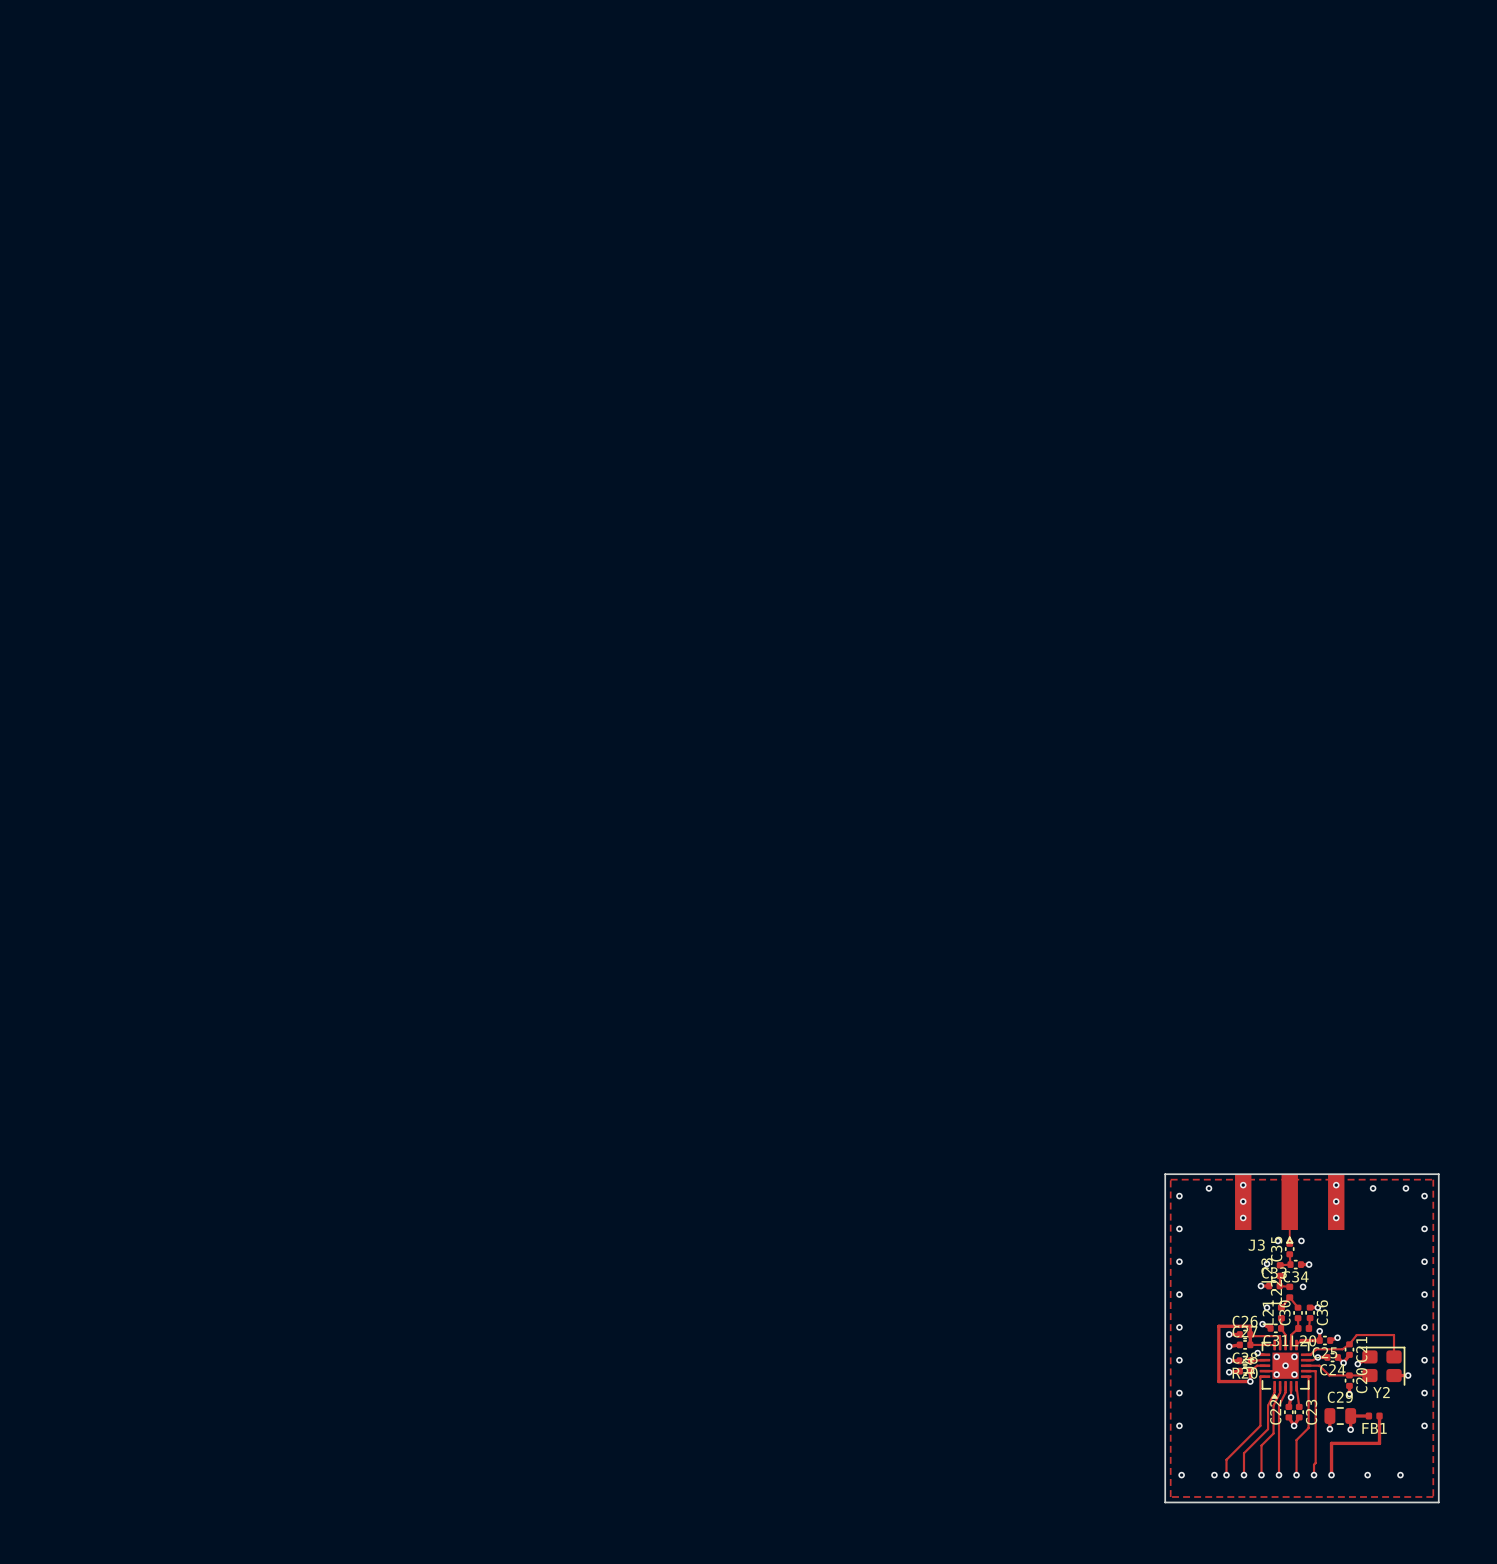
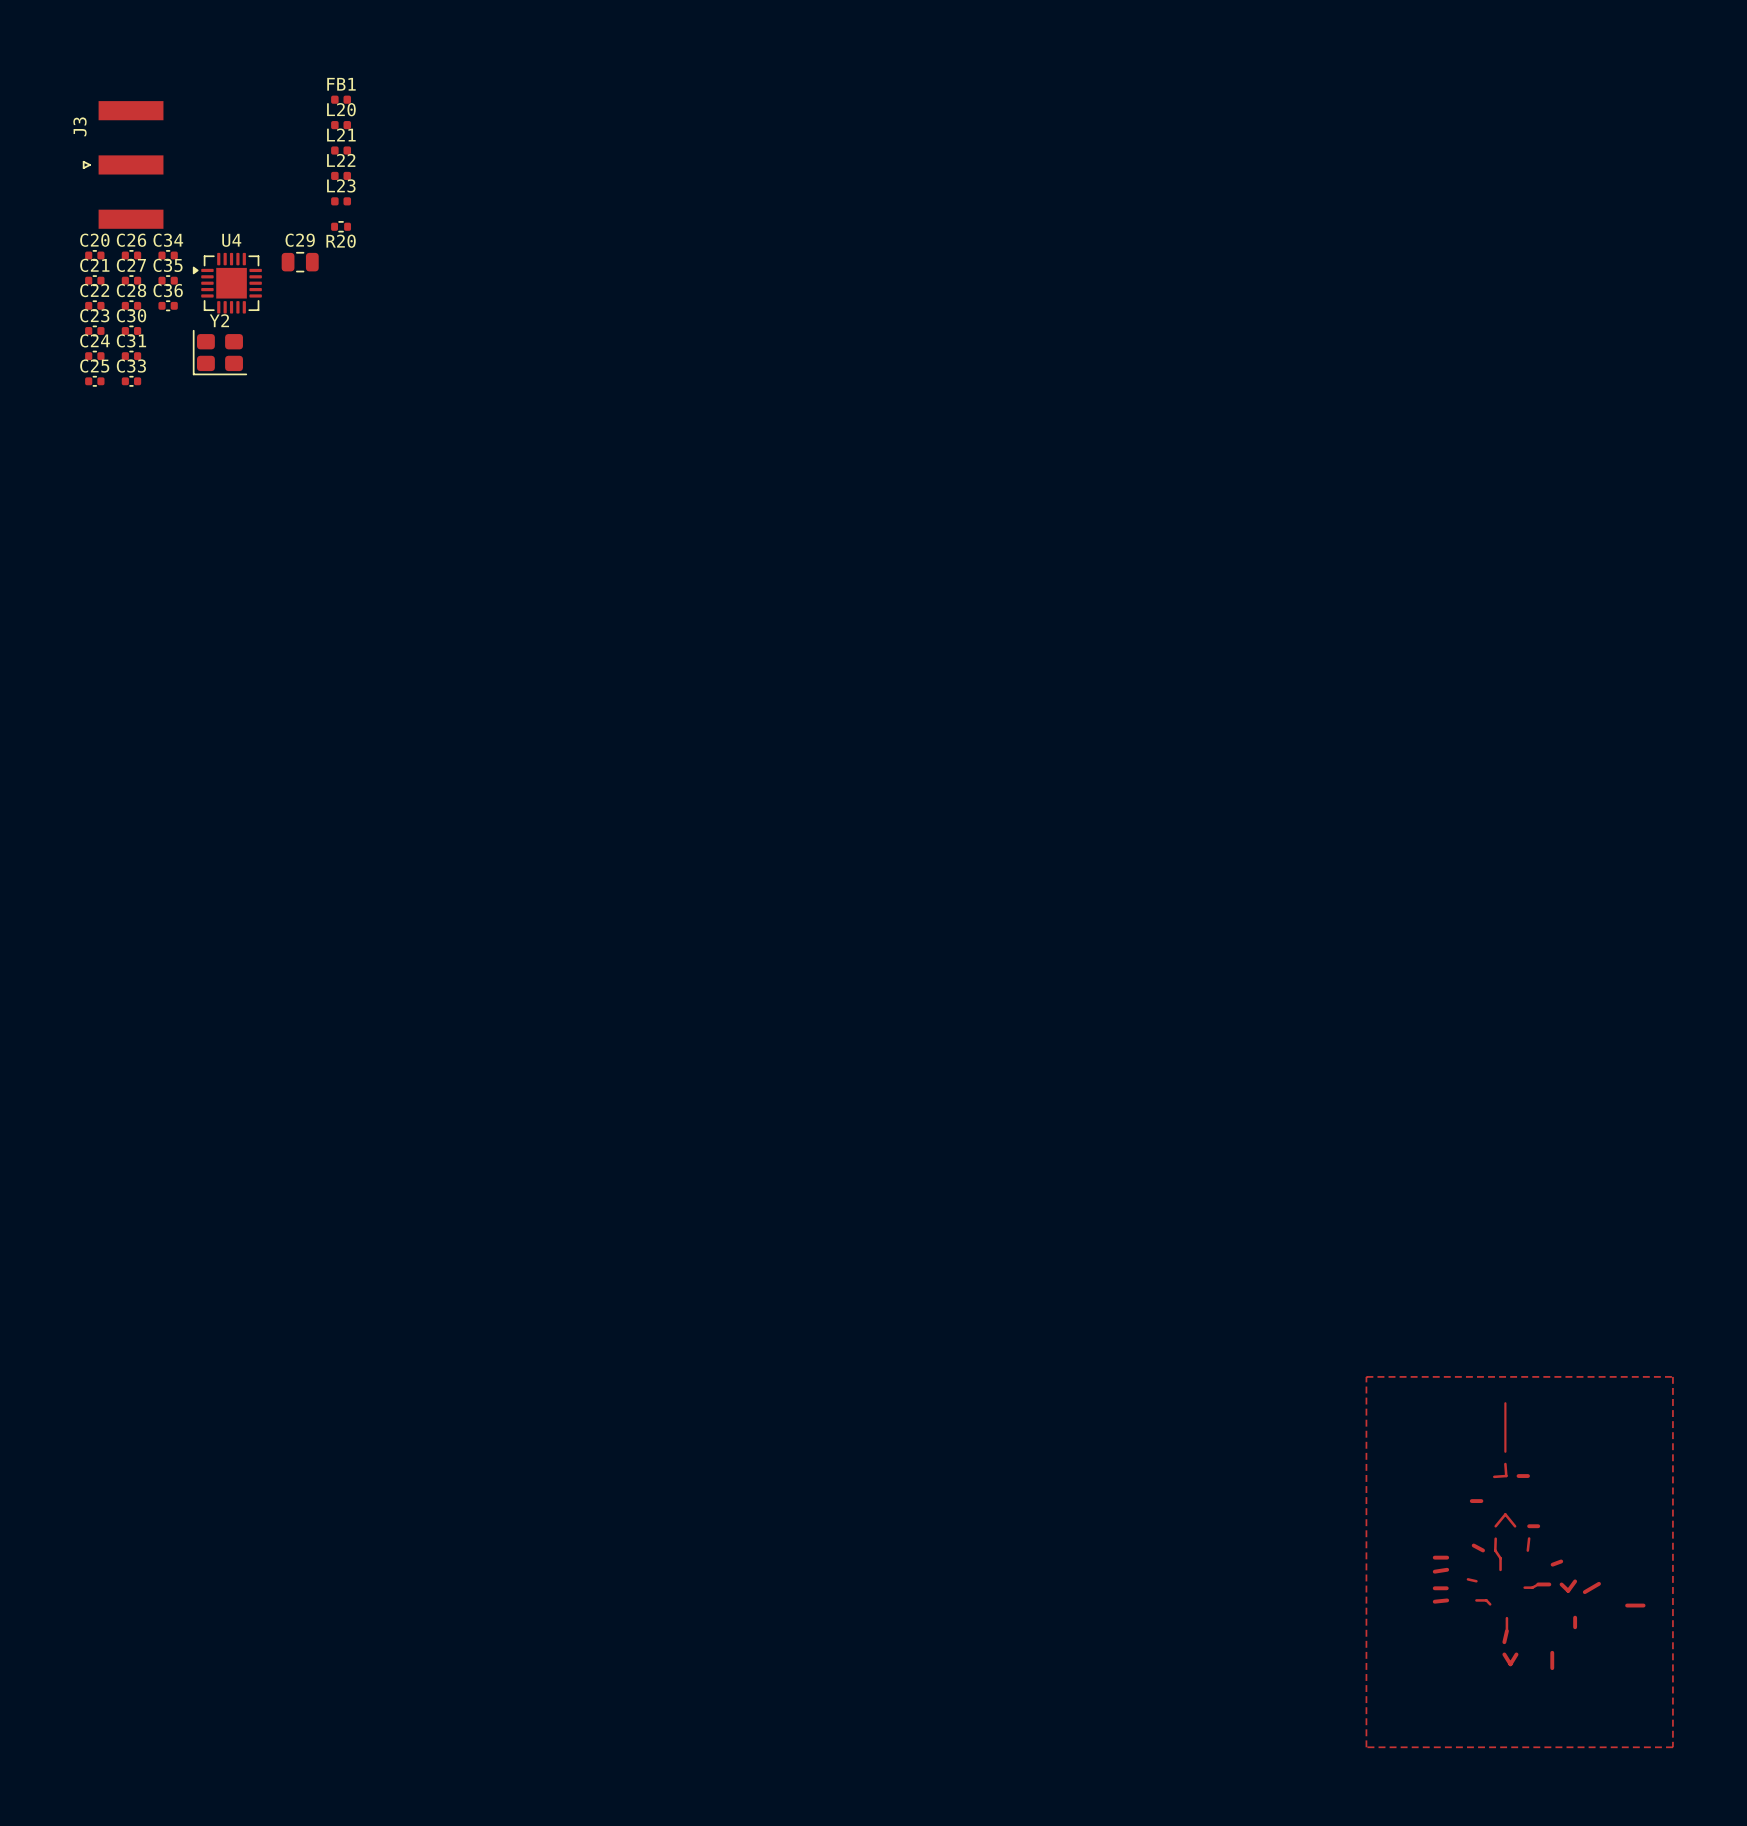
board edge: (1165, 1174) (1438, 1174) (1438, 1502) (1165, 1502) (1165, 1174) -> none
via: (1243, 1185) -> none
via: (1336, 1185) -> none
via: (1208, 1188) -> none
via: (1373, 1188) -> none
via: (1405, 1188) -> none
via: (1179, 1196) -> none
via: (1424, 1196) -> none
via: (1243, 1201) -> none
via: (1336, 1201) -> none
J3 rotation: 0° (1289, 1208) -> 90° clockwise (123, 164)
J3 position: (1289, 1208) -> (123, 164)
via: (1243, 1217) -> none
via: (1336, 1217) -> none
via: (1179, 1228) -> none
via: (1424, 1228) -> none
via: (1277, 1240) -> none
via: (1301, 1240) -> none
C35 rotation: 0° (1289, 1249) -> 90° clockwise (168, 280)
C35 position: (1289, 1249) -> (168, 280)
via: (1179, 1261) -> none
via: (1424, 1261) -> none
via: (1266, 1263) -> none
C34 position: (1295, 1264) -> (168, 255)
via: (1309, 1264) -> none
L23 rotation: 0° (1280, 1270) -> 90° clockwise (341, 201)
L23 position: (1280, 1270) -> (341, 201)
track: (1280, 1275) (1279, 1286) (1289, 1286) -> none
C34 name position: C34 (1295, 1276) -> C34 (168, 240)
via: (1260, 1286) -> none
C33 position: (1274, 1286) -> (131, 381)
via: (1303, 1286) -> none
L22 rotation: 0° (1289, 1292) -> 90° clockwise (341, 175)
L22 position: (1289, 1292) -> (341, 175)
via: (1179, 1294) -> none
via: (1424, 1294) -> none
via: (1266, 1307) -> none
via: (1317, 1307) -> none
L21 rotation: 0° (1281, 1312) -> 90° clockwise (341, 150)
L21 position: (1281, 1312) -> (341, 150)
C30 rotation: 0° (1298, 1312) -> 90° clockwise (131, 330)
C30 position: (1298, 1312) -> (131, 330)
C36 rotation: 0° (1310, 1312) -> 90° clockwise (168, 305)
C36 position: (1310, 1312) -> (168, 305)
track: (1298, 1318) (1298, 1328) (1291, 1335) (1291, 1345) -> none
via: (1262, 1324) -> none
via: (1179, 1327) -> none
via: (1424, 1327) -> none
C31 position: (1275, 1328) -> (131, 356)
L20 position: (1303, 1328) -> (341, 125)
track: (1319, 1331) (1319, 1340) (1300, 1340) (1296, 1345) -> none
via: (1319, 1331) -> none
via: (1229, 1334) -> none
C26 position: (1245, 1334) -> (131, 255)
track: (1250, 1334) (1252, 1336) (1280, 1336) (1280, 1345) -> none
via: (1337, 1337) -> none
C31 name position: C31 (1275, 1340) -> C31 (131, 340)
L20 name position: L20 (1303, 1340) -> L20 (341, 109)
C25 position: (1324, 1340) -> (94, 381)
C27 position: (1245, 1344) -> (131, 280)
track: (1274, 1345) (1250, 1344) (1250, 1326) (1218, 1326) (1218, 1381) (1250, 1381) (1250, 1371) (1257, 1365) (1264, 1365) -> none
via: (1229, 1346) -> none
C21 rotation: 0° (1349, 1349) -> 90° clockwise (94, 280)
C21 position: (1349, 1349) -> (94, 280)
C25 name position: C25 (1324, 1352) -> C25 (94, 366)
via: (1257, 1353) -> none
track: (1306, 1354) (1310, 1354) (1316, 1349) (1342, 1349) (1356, 1335) (1394, 1335) (1394, 1356) -> none
via: (1276, 1356) -> none
via: (1294, 1356) -> none
via: (1317, 1357) -> none
C24 position: (1332, 1357) -> (94, 356)
via: (1179, 1360) -> none
via: (1229, 1360) -> none
R20 position: (1245, 1360) -> (341, 226)
track: (1264, 1360) (1250, 1360) -> none
via: (1424, 1360) -> none
via: (1343, 1362) -> none
via: (1357, 1364) -> none
via: (1285, 1365) -> none
track: (1306, 1365) (1319, 1365) (1329, 1375) (1369, 1375) -> none
Y2 rotation: 0° (1381, 1366) -> 180° (219, 352)
Y2 position: (1381, 1366) -> (219, 352)
U4 rotation: 0° (1285, 1369) -> 90° clockwise (227, 283)
U4 position: (1285, 1369) -> (227, 283)
C24 name position: C24 (1332, 1369) -> C24 (94, 340)
C28 position: (1245, 1371) -> (131, 305)
track: (1306, 1371) (1315, 1371) (1314, 1475) -> none
via: (1229, 1372) -> none
via: (1276, 1374) -> none
via: (1294, 1374) -> none
via: (1408, 1375) -> none
track: (1264, 1376) (1260, 1376) (1260, 1425) (1226, 1459) (1226, 1475) -> none
track: (1306, 1376) (1308, 1376) (1308, 1428) (1296, 1440) (1296, 1475) -> none
C20 rotation: 0° (1349, 1380) -> 90° clockwise (94, 255)
C20 position: (1349, 1380) -> (94, 255)
via: (1250, 1381) -> none
track: (1274, 1386) (1274, 1392) (1268, 1405) (1268, 1429) (1243, 1453) (1243, 1475) -> none
track: (1280, 1386) (1280, 1392) (1273, 1405) (1273, 1433) (1261, 1445) (1261, 1475) -> none
track: (1285, 1386) (1285, 1392) (1279, 1405) (1279, 1475) -> none
track: (1296, 1386) (1299, 1406) -> none
via: (1179, 1393) -> none
via: (1424, 1393) -> none
via: (1349, 1394) -> none
via: (1291, 1397) -> none
C22 rotation: 0° (1288, 1412) -> 90° clockwise (94, 305)
C22 position: (1288, 1412) -> (94, 305)
C23 rotation: 0° (1299, 1412) -> 90° clockwise (94, 330)
C23 position: (1299, 1412) -> (94, 330)
C29 position: (1340, 1416) -> (300, 262)
track: (1368, 1416) (1350, 1416) (1350, 1429) -> none
FB1 position: (1374, 1416) -> (341, 99)
track: (1379, 1416) (1379, 1443) (1331, 1443) (1331, 1475) -> none
via: (1179, 1425) -> none
via: (1294, 1425) -> none
via: (1424, 1425) -> none
FB1 name position: FB1 (1374, 1428) -> FB1 (341, 84)
via: (1329, 1429) -> none
via: (1350, 1429) -> none
via: (1181, 1475) -> none
via: (1214, 1475) -> none
via: (1226, 1475) -> none
via: (1243, 1475) -> none
via: (1261, 1475) -> none
via: (1279, 1475) -> none
via: (1296, 1475) -> none
via: (1314, 1475) -> none
via: (1331, 1475) -> none
via: (1367, 1475) -> none
via: (1400, 1475) -> none

